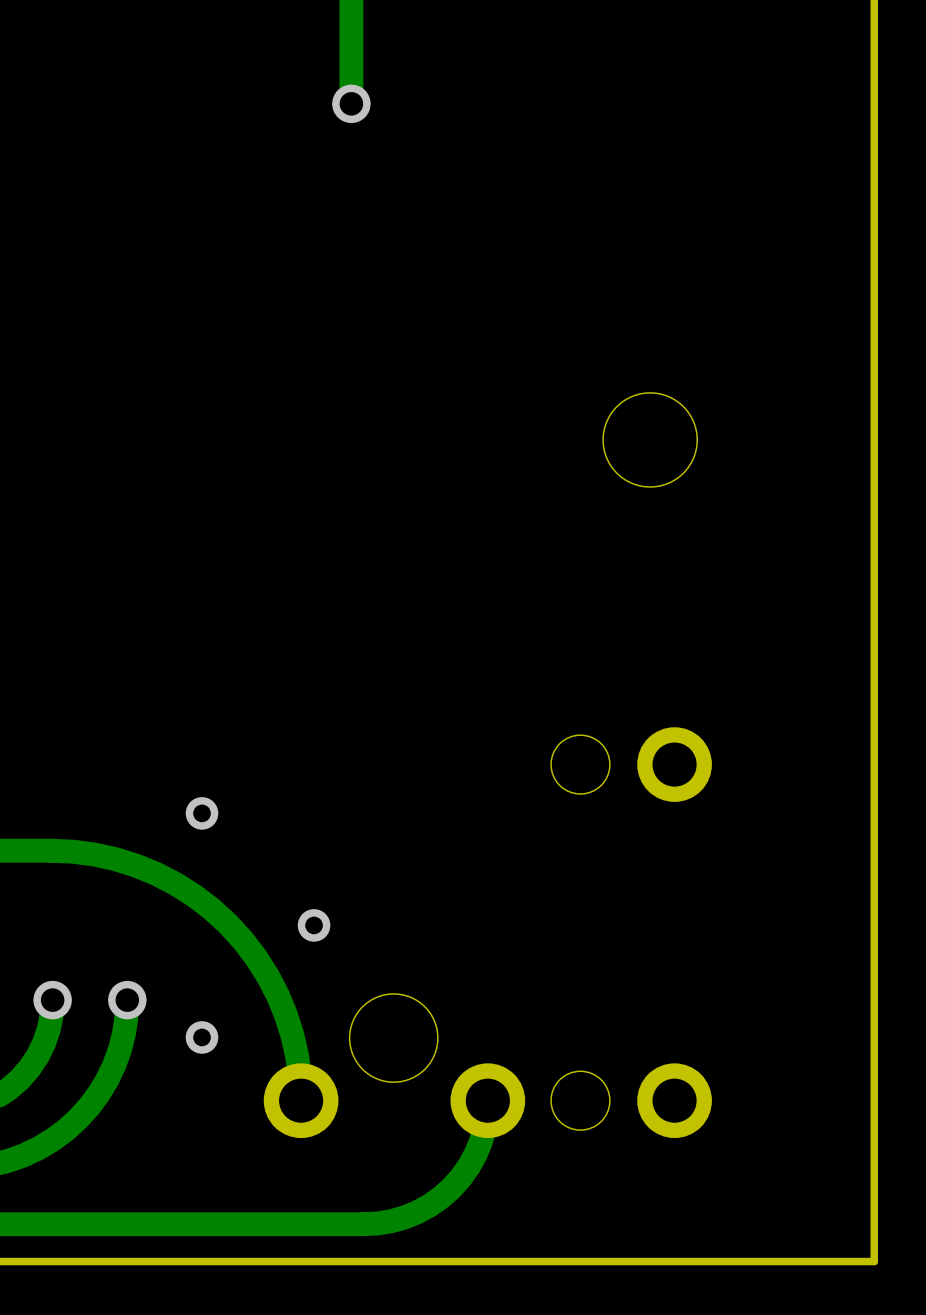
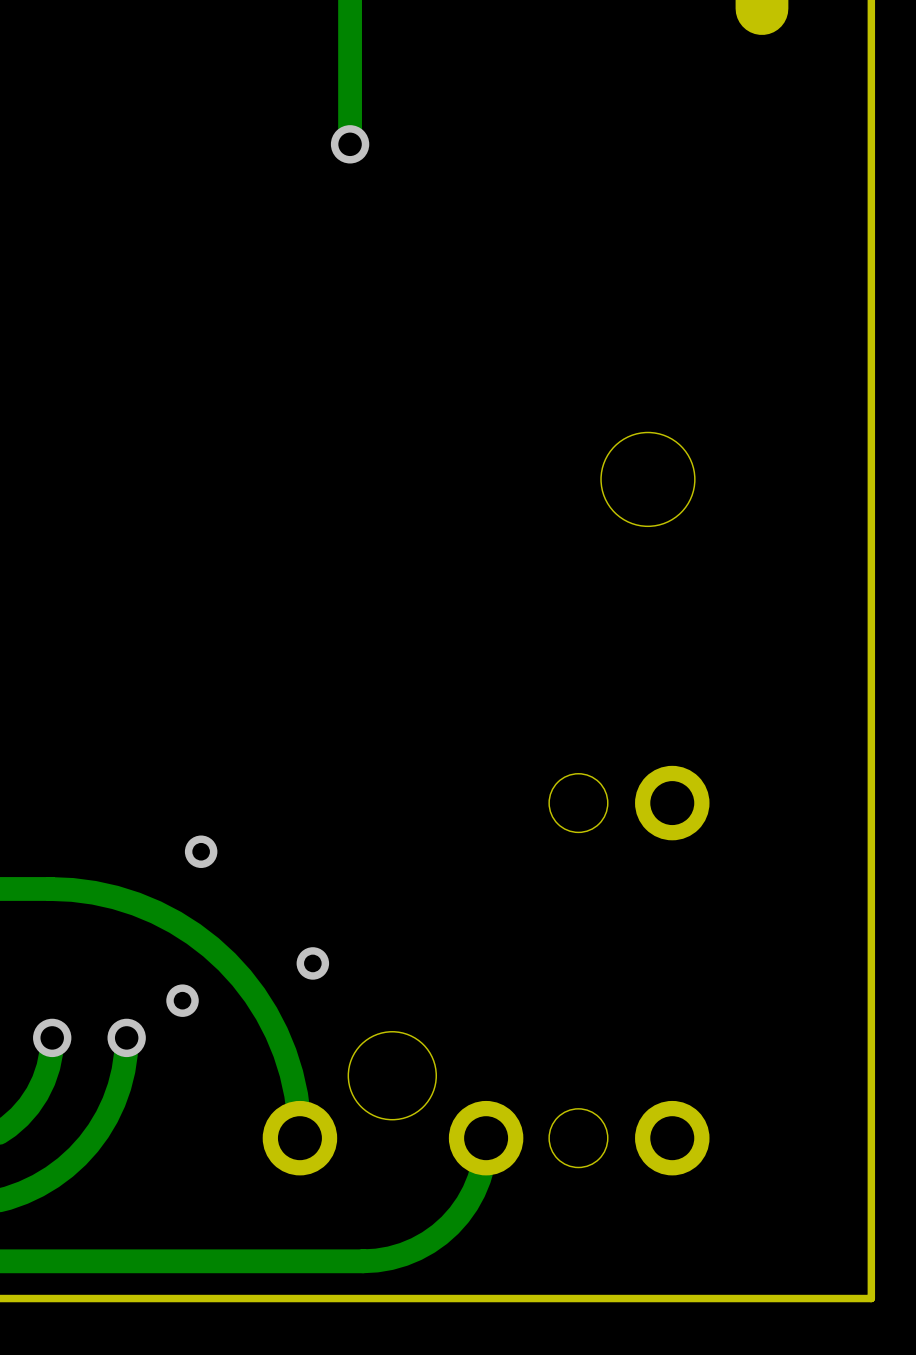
via position: (202, 1037) -> (182, 1000)

